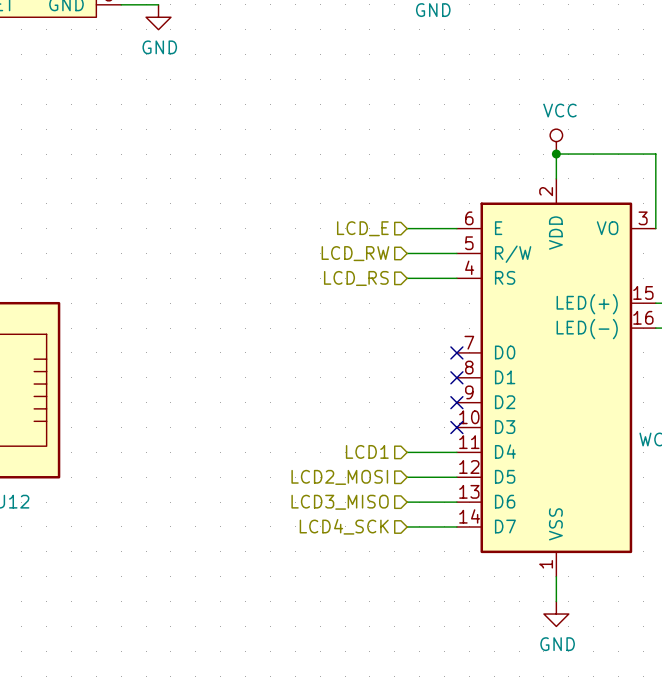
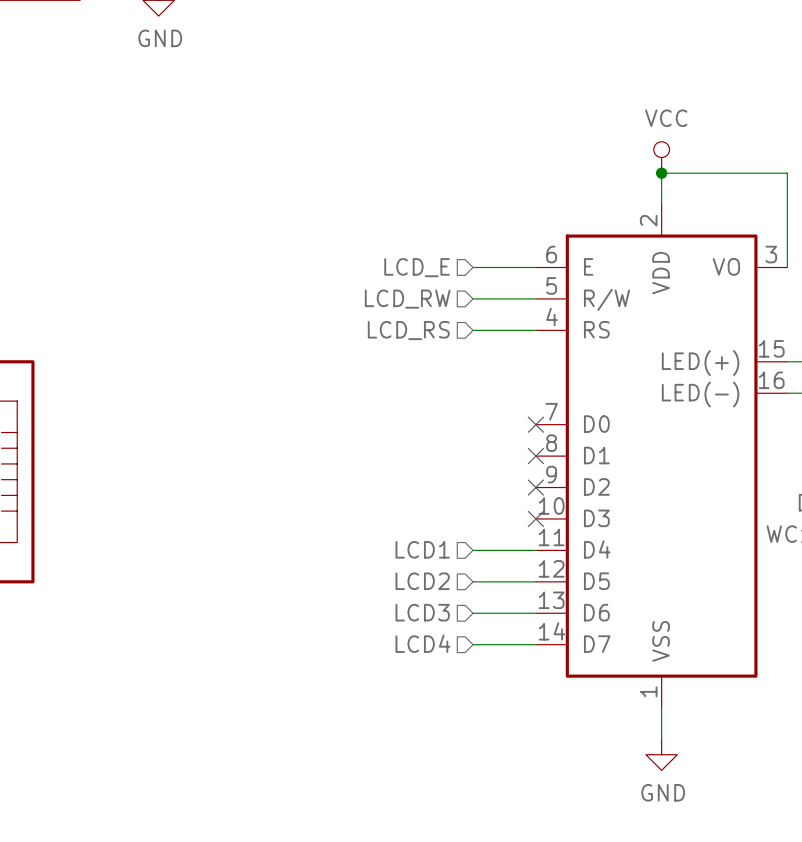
hierarchical label: LCD2_MOSI (339, 477) -> LCD2 (422, 581)
hierarchical label: LCD3_MISO (340, 502) -> LCD3 (422, 612)
hierarchical label: LCD4_SCK (344, 526) -> LCD4 (423, 643)

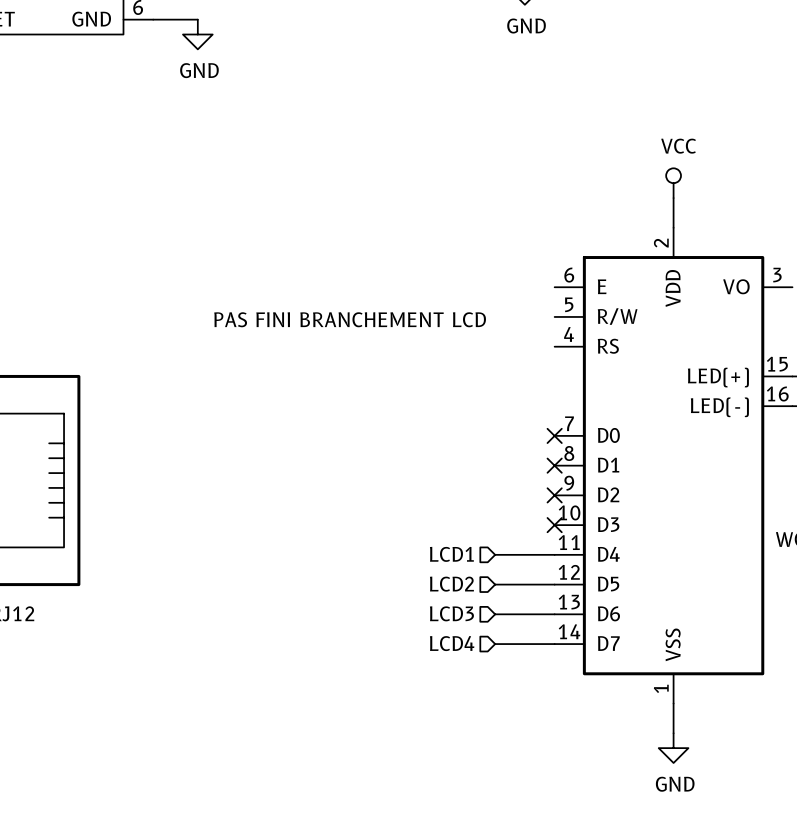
wire: (661, 173) (787, 173) (787, 267) -> none
junction: (661, 173) -> none
hierarchical label: LCD_E (417, 267) -> none
wire: (473, 267) (535, 267) -> none
wire: (473, 298) (535, 298) -> none
hierarchical label: LCD_RW (407, 299) -> none
text: none -> PAS FINI BRANCHEMENT LCD (350, 319)
hierarchical label: LCD_RS (408, 330) -> none
wire: (473, 330) (535, 330) -> none

